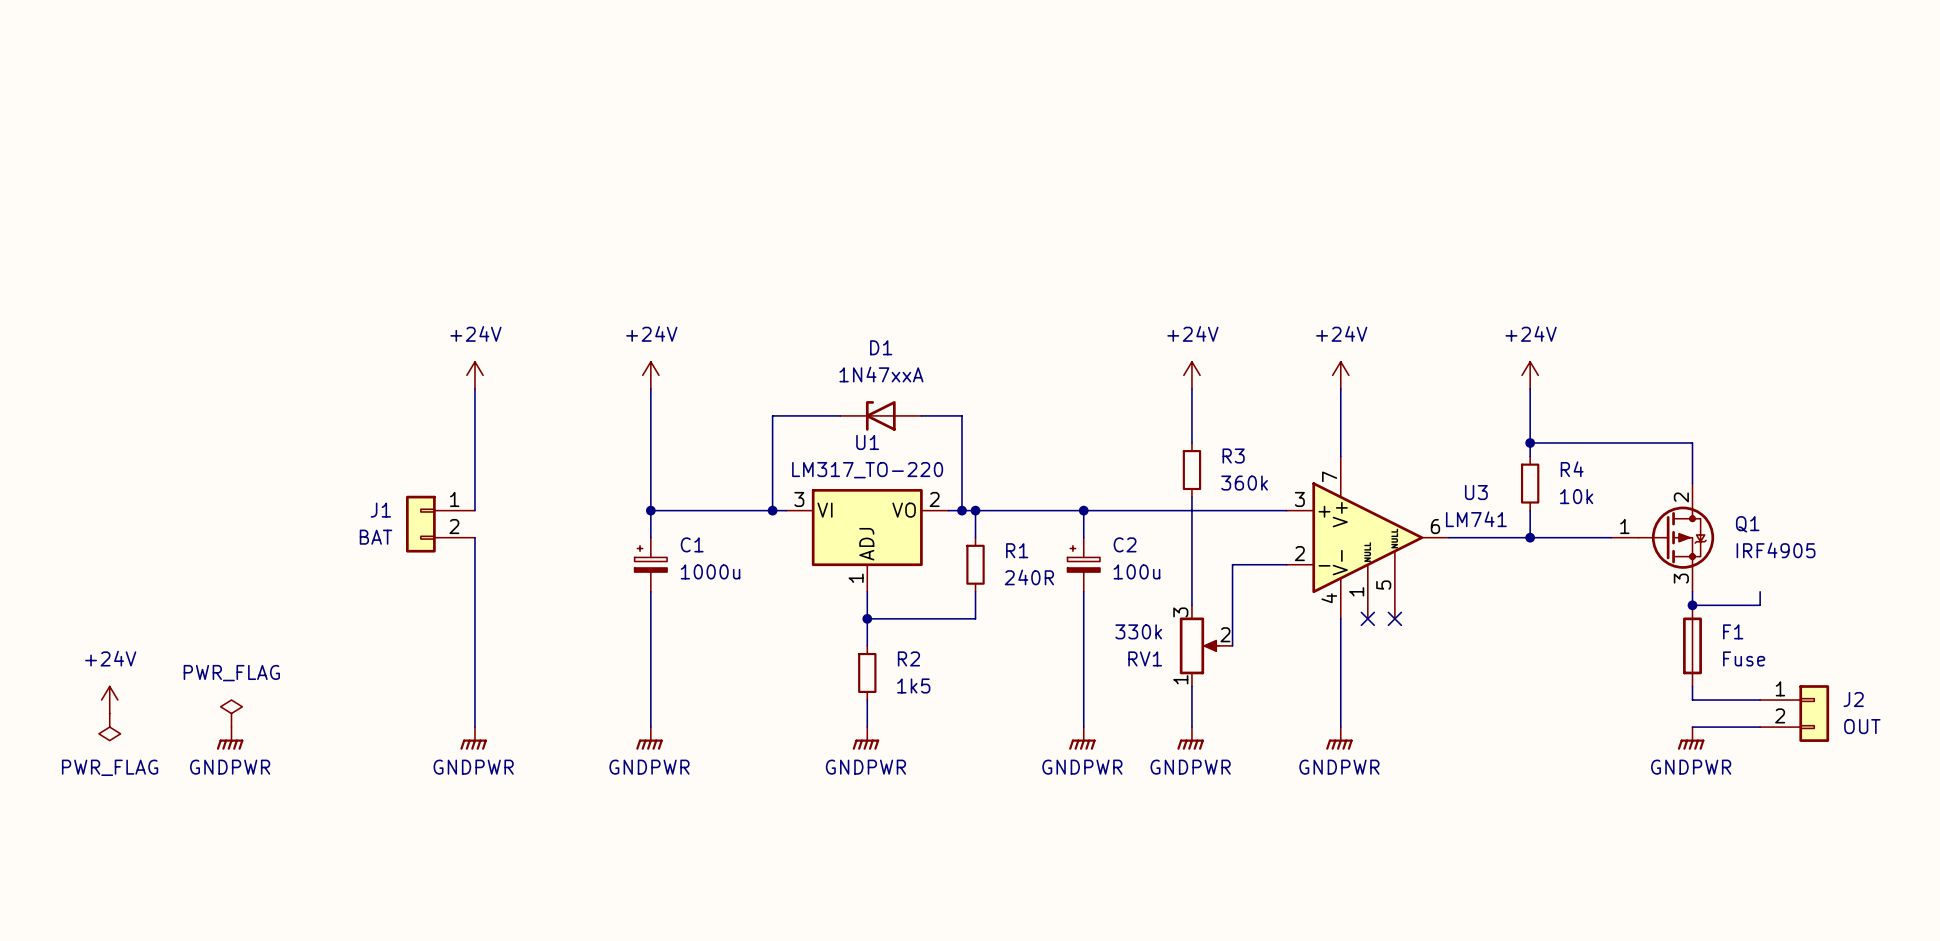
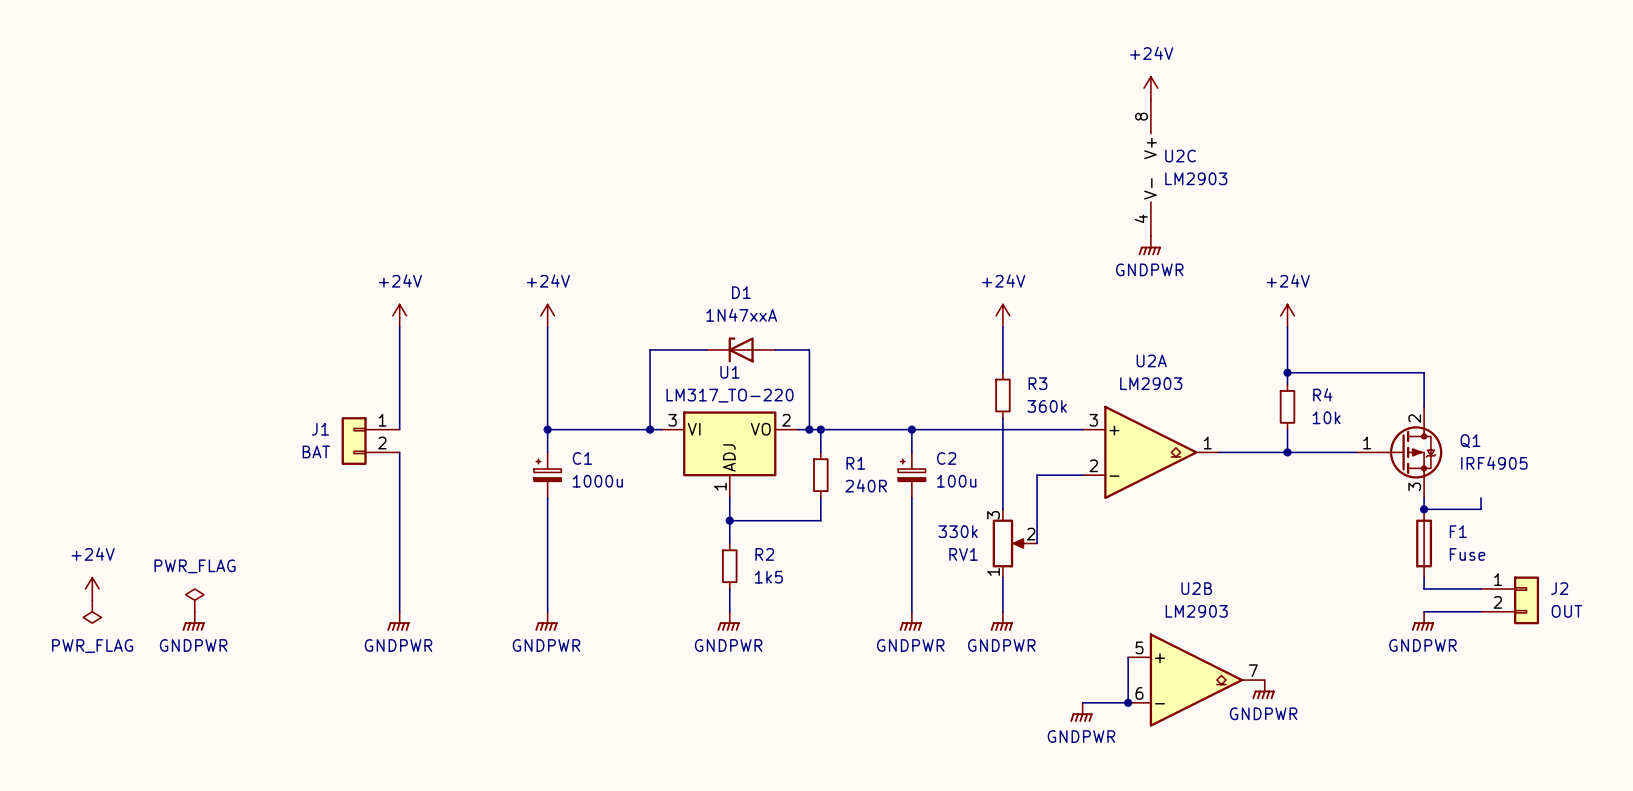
power symbol: none -> +24V (1150, 88)
U2C: none -> LM2903 (1150, 167)
power symbol: none -> GNDPWR (1149, 245)
power symbol: +24V (1340, 375) -> none
wire: (1340, 388) (1340, 456) -> none
U3: LM741 (1367, 537) -> none
U2A: none -> LM2903 (1150, 452)
wire: (1340, 618) (1340, 727) -> none
no-connect mark: (1367, 618) -> none
no-connect mark: (1394, 618) -> none
power symbol: GNDPWR (1339, 738) -> none
wire: none -> (1128, 657) (1128, 702) (1082, 702)
U2B: none -> LM2903 (1196, 680)
power symbol: none -> GNDPWR (1263, 689)
junction: none -> (1128, 702)
power symbol: none -> GNDPWR (1081, 712)

